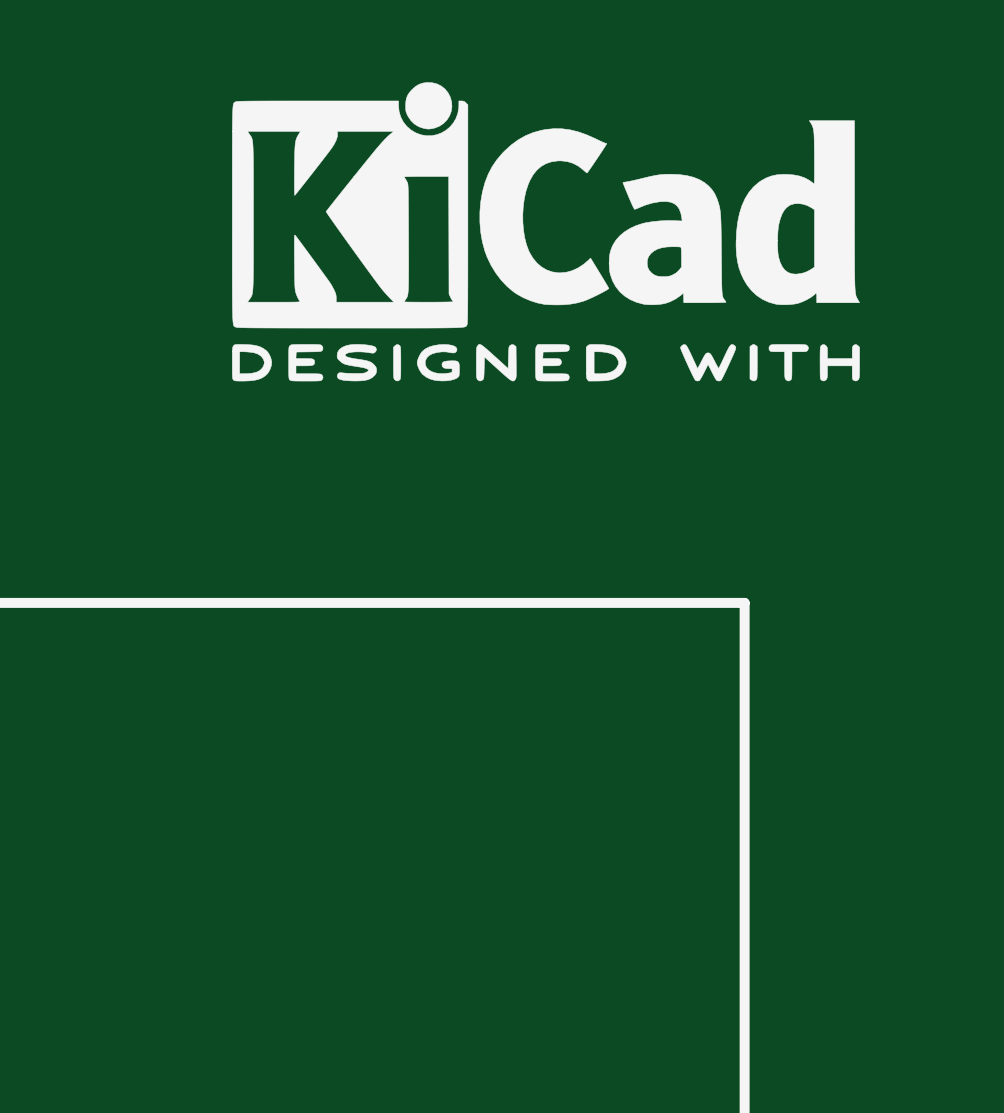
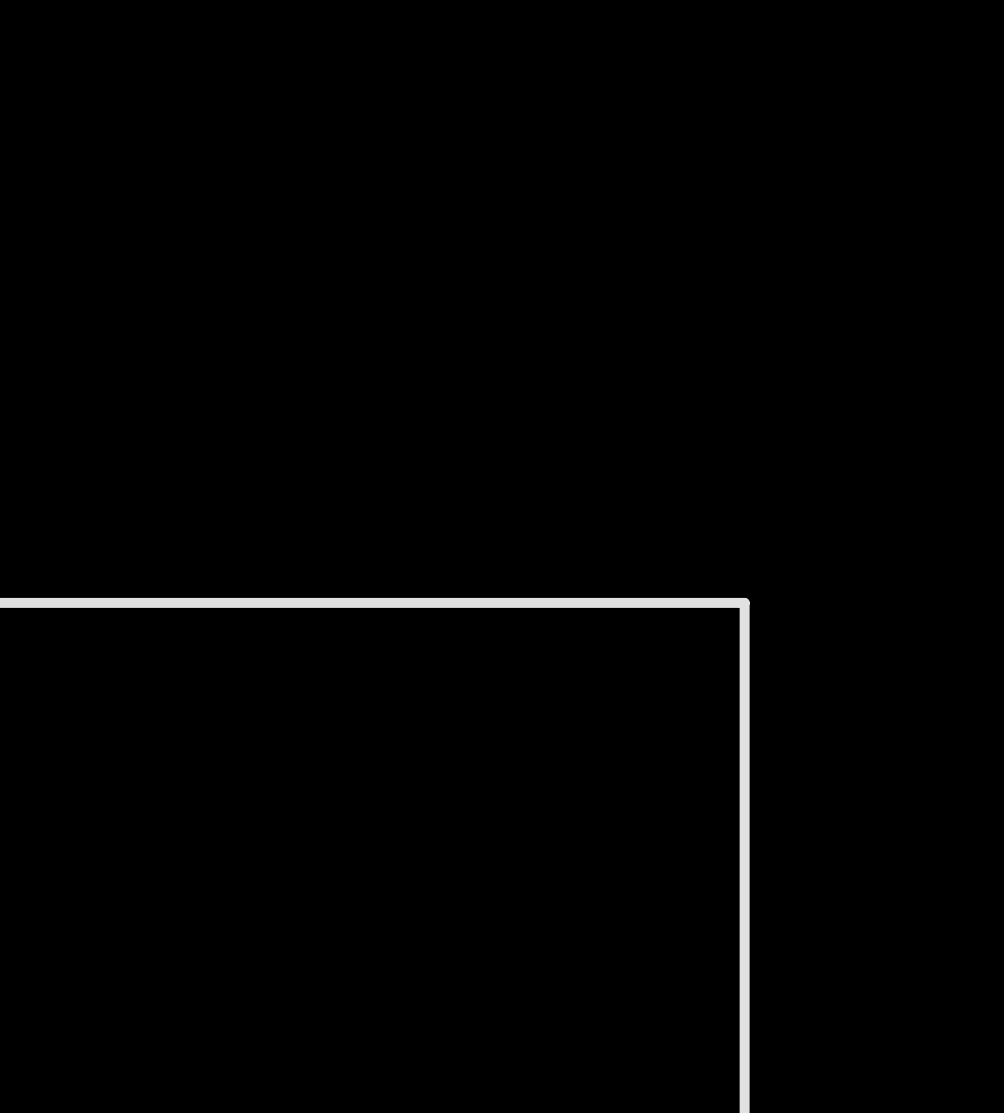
drawing: [232, 82, 860, 382] -> none

